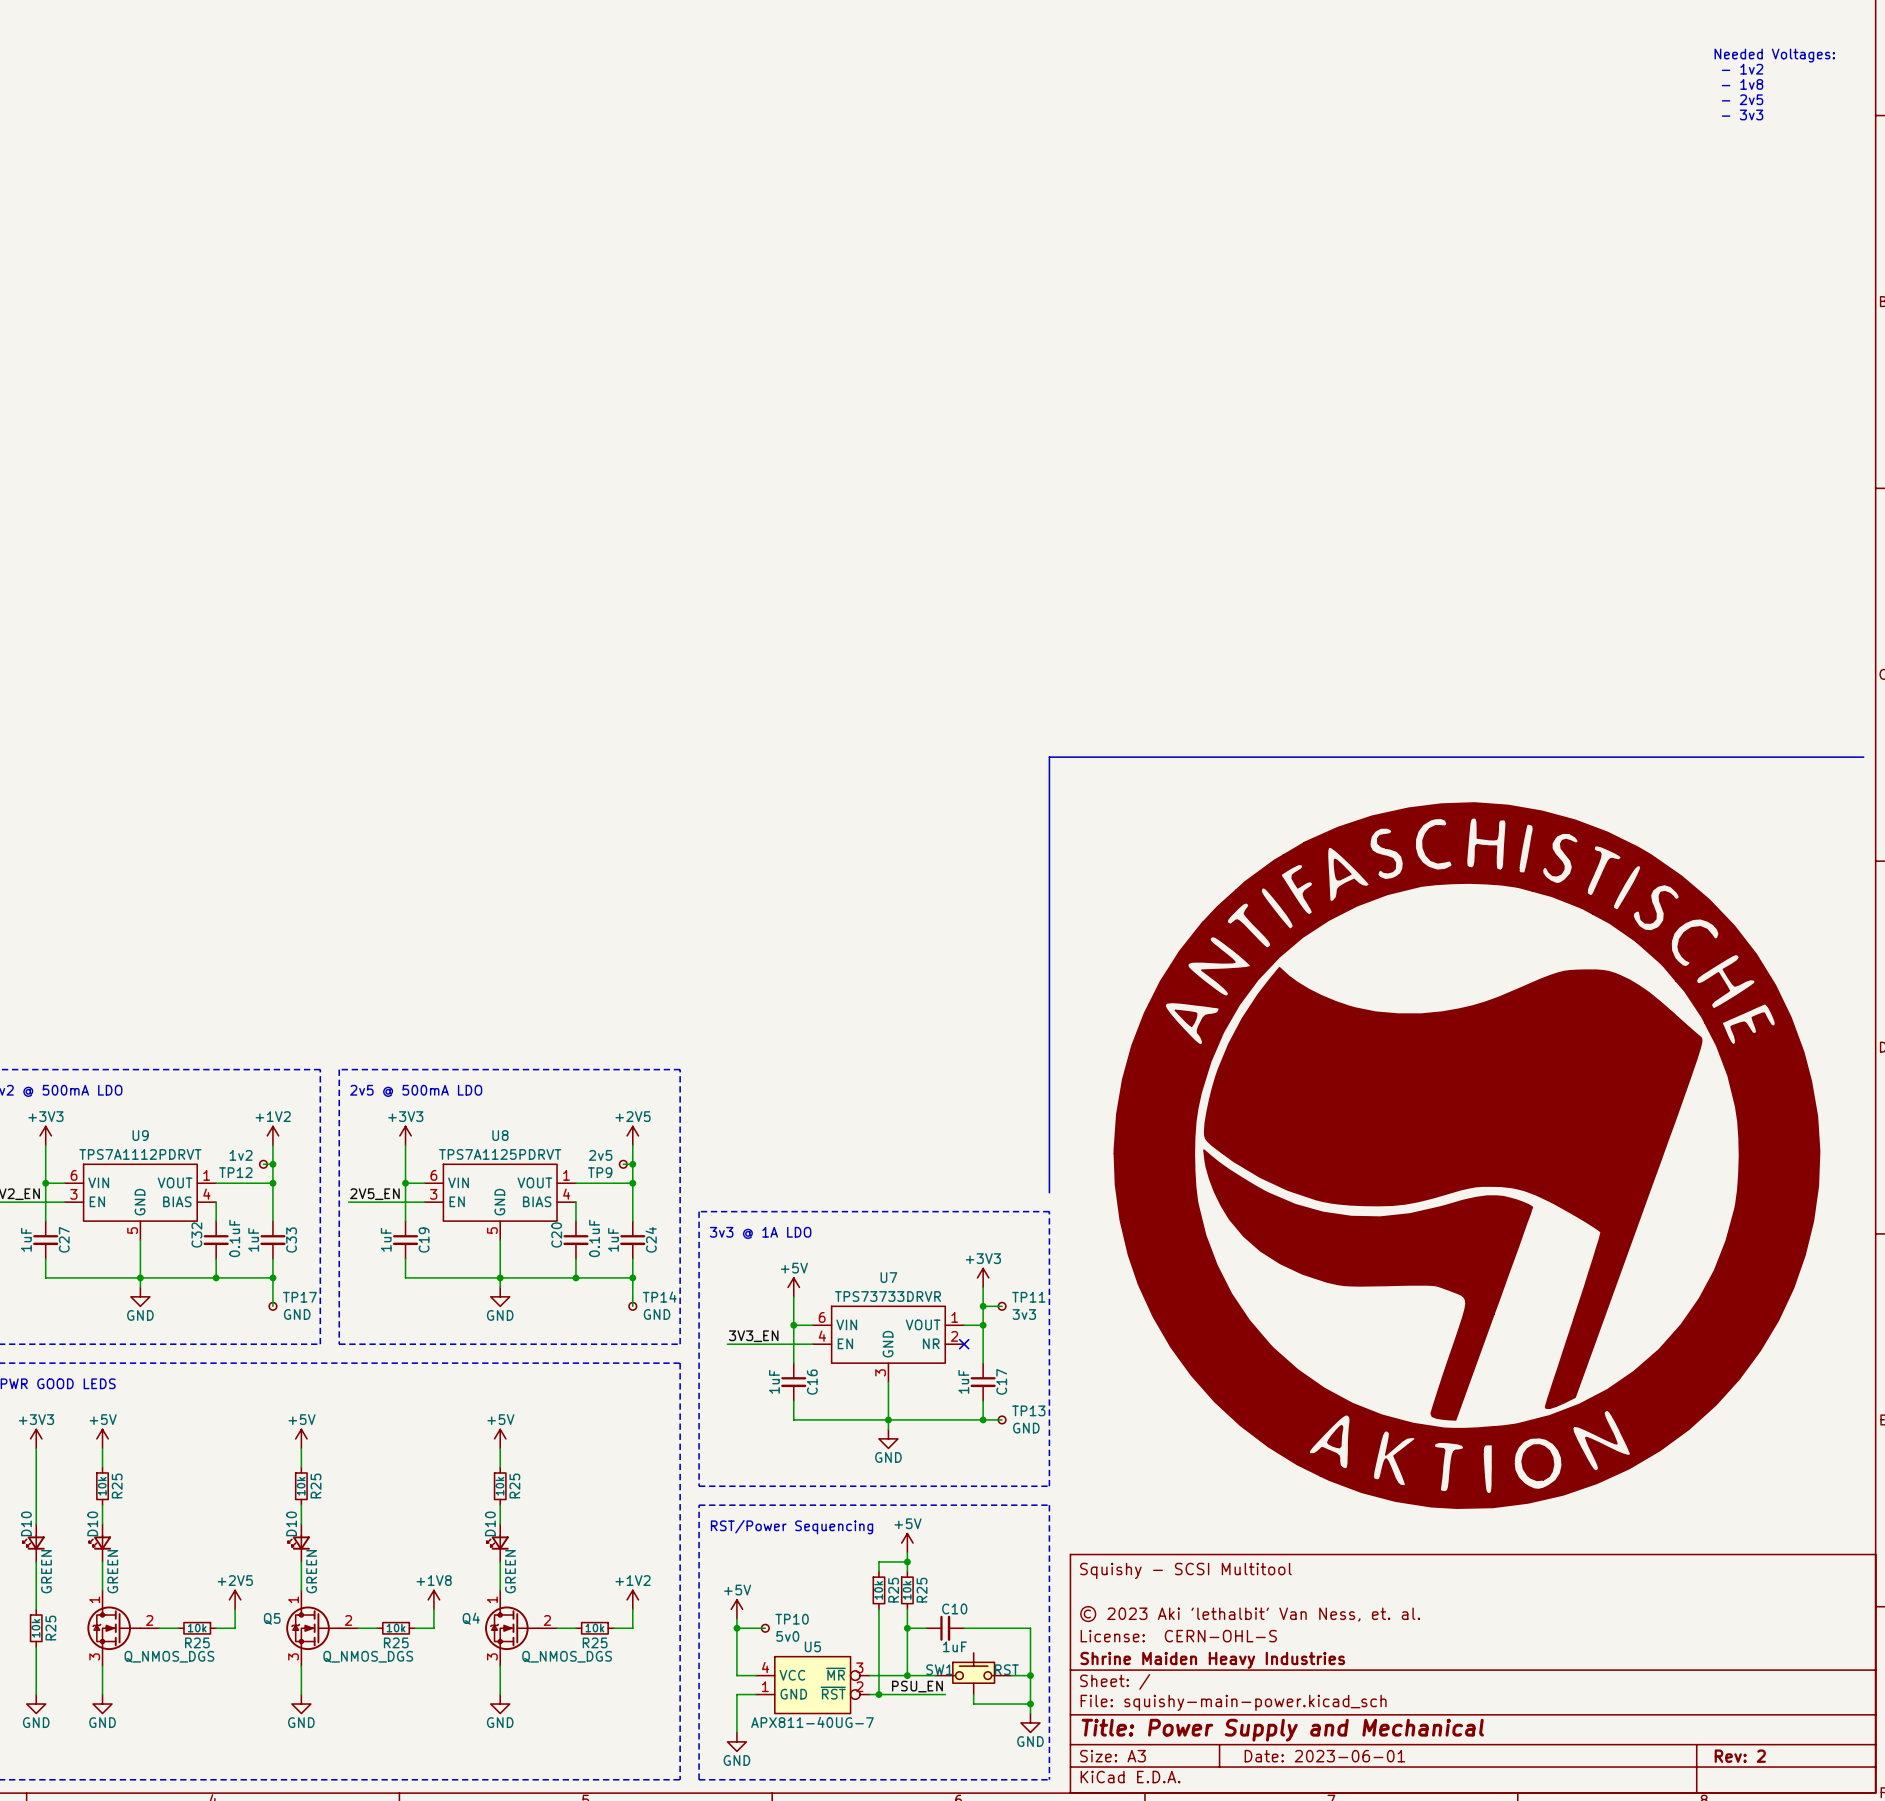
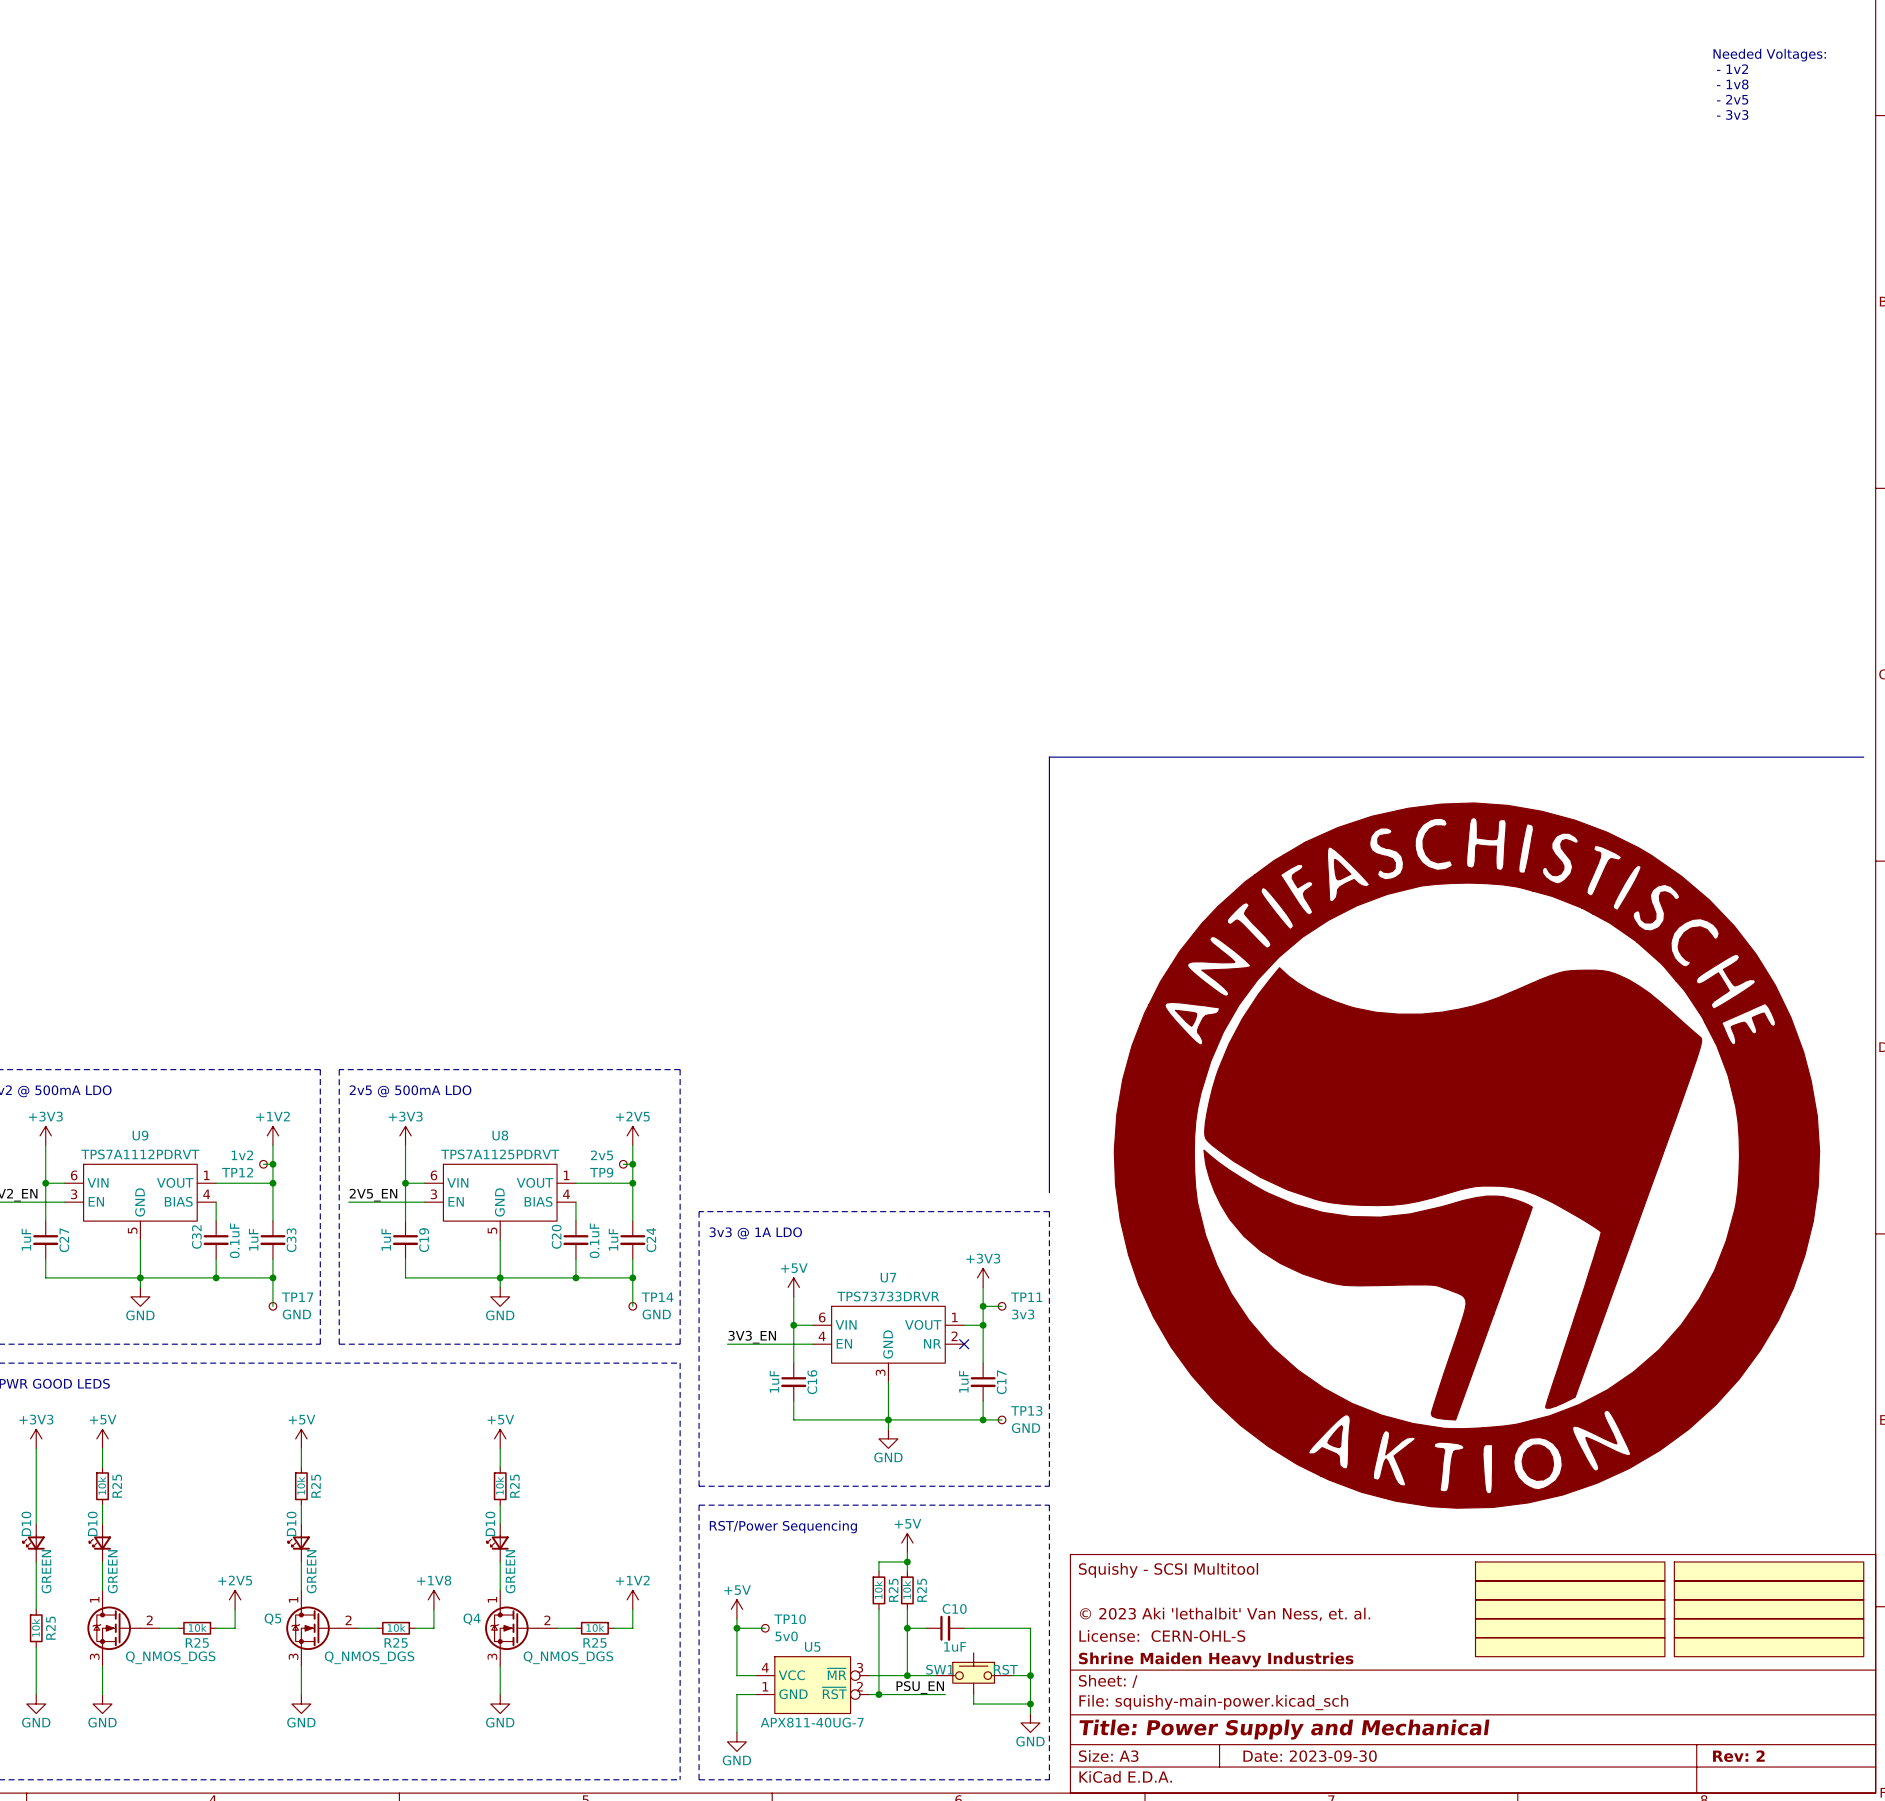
part: none -> (1570, 1609)
part: none -> (1769, 1609)
title block: Date: 2023-06-01 (1324, 1756) -> Date: 2023-09-30 (1310, 1756)

